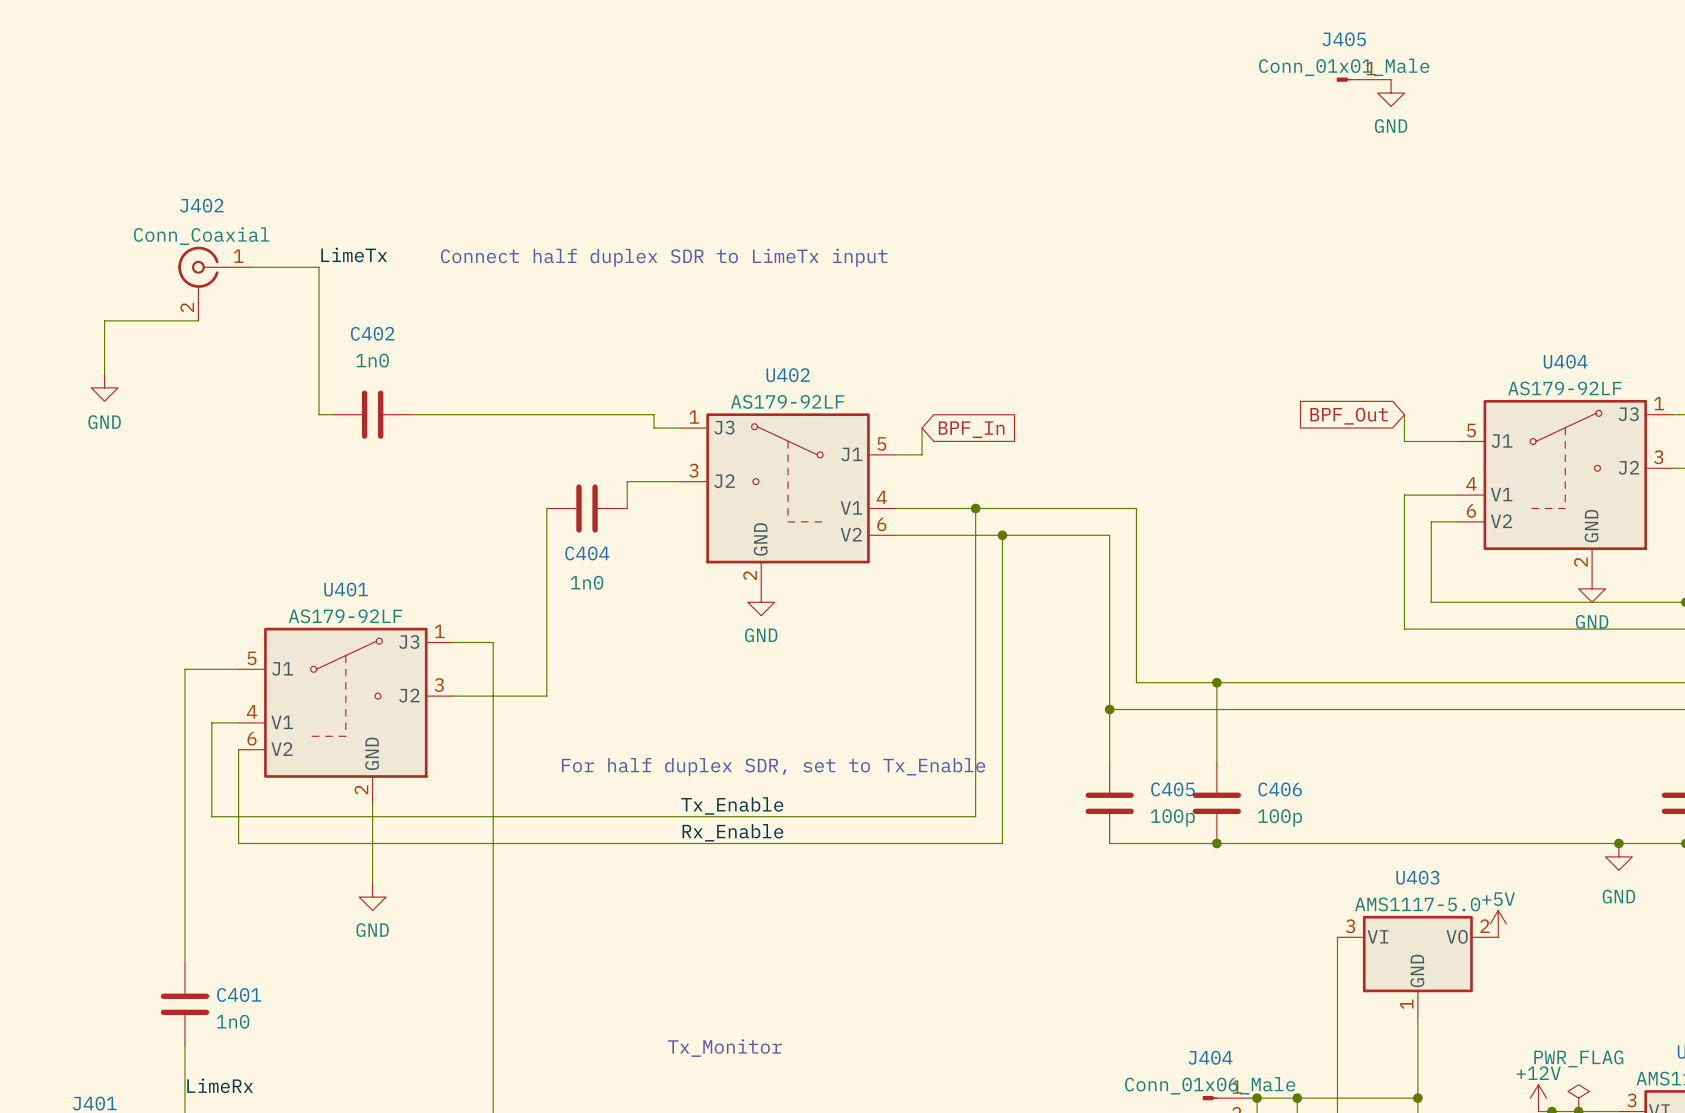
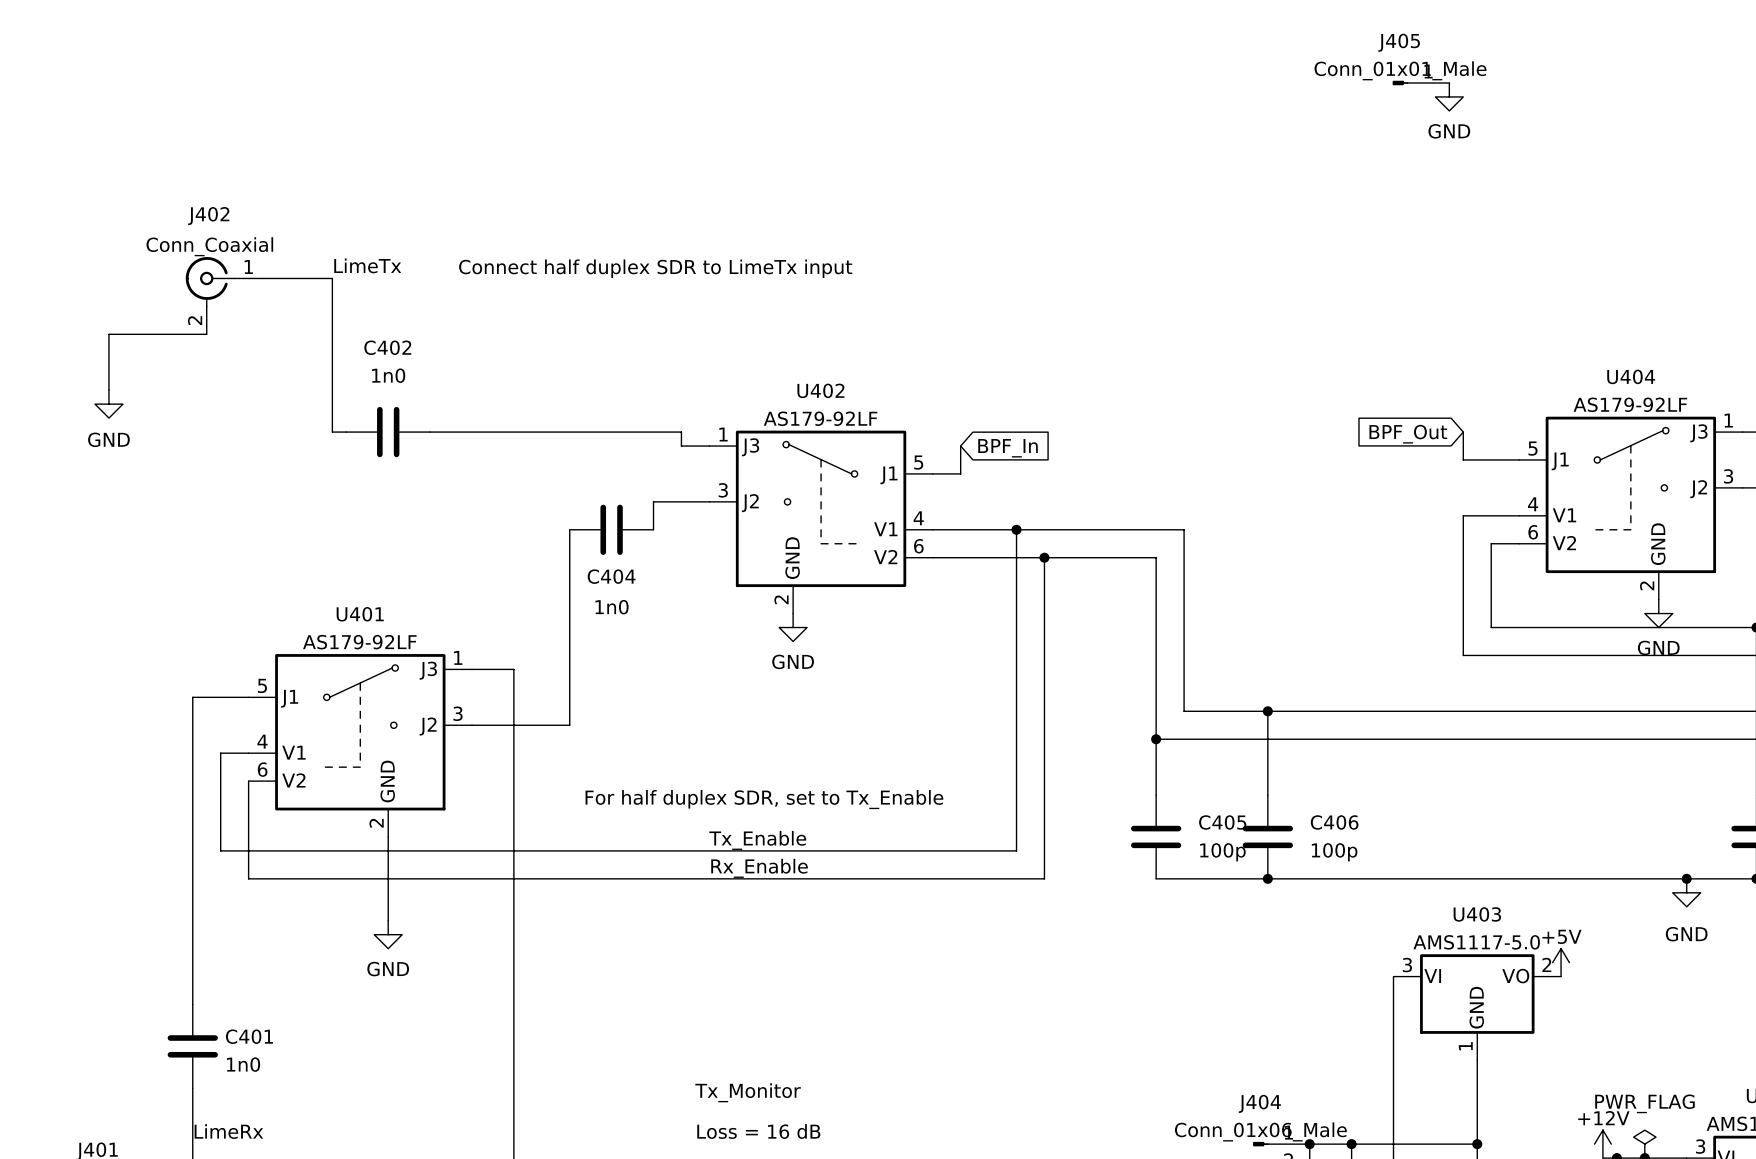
label: none -> Loss = 16 dB (758, 1131)

